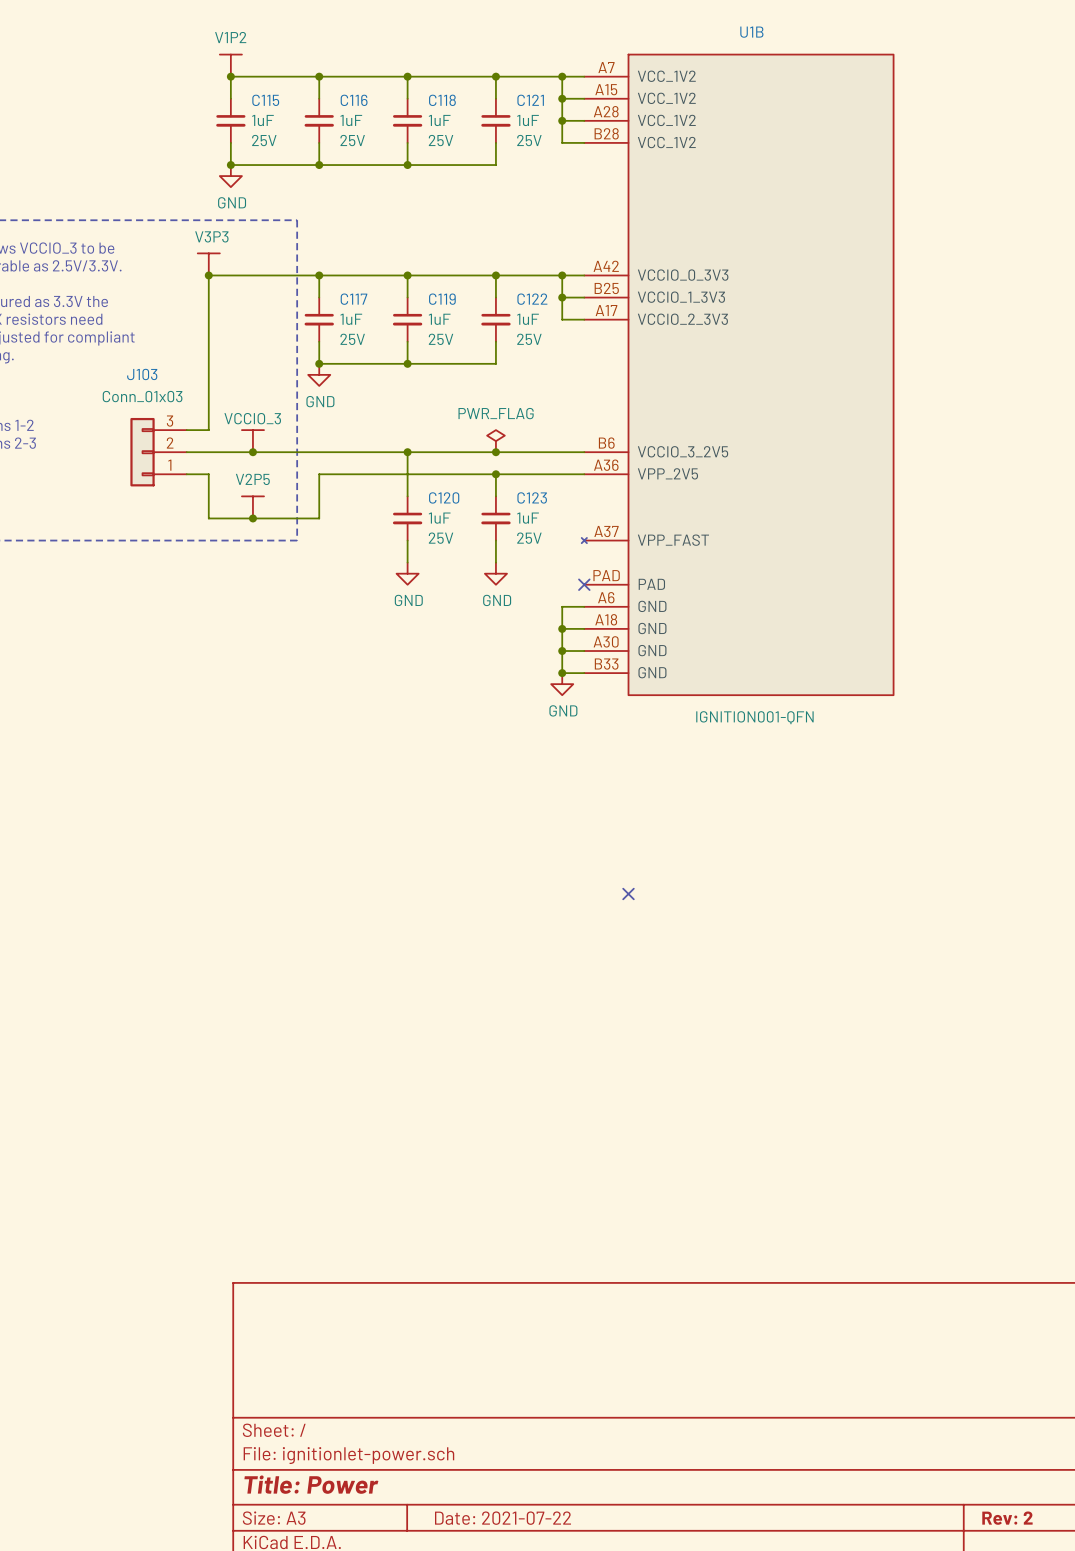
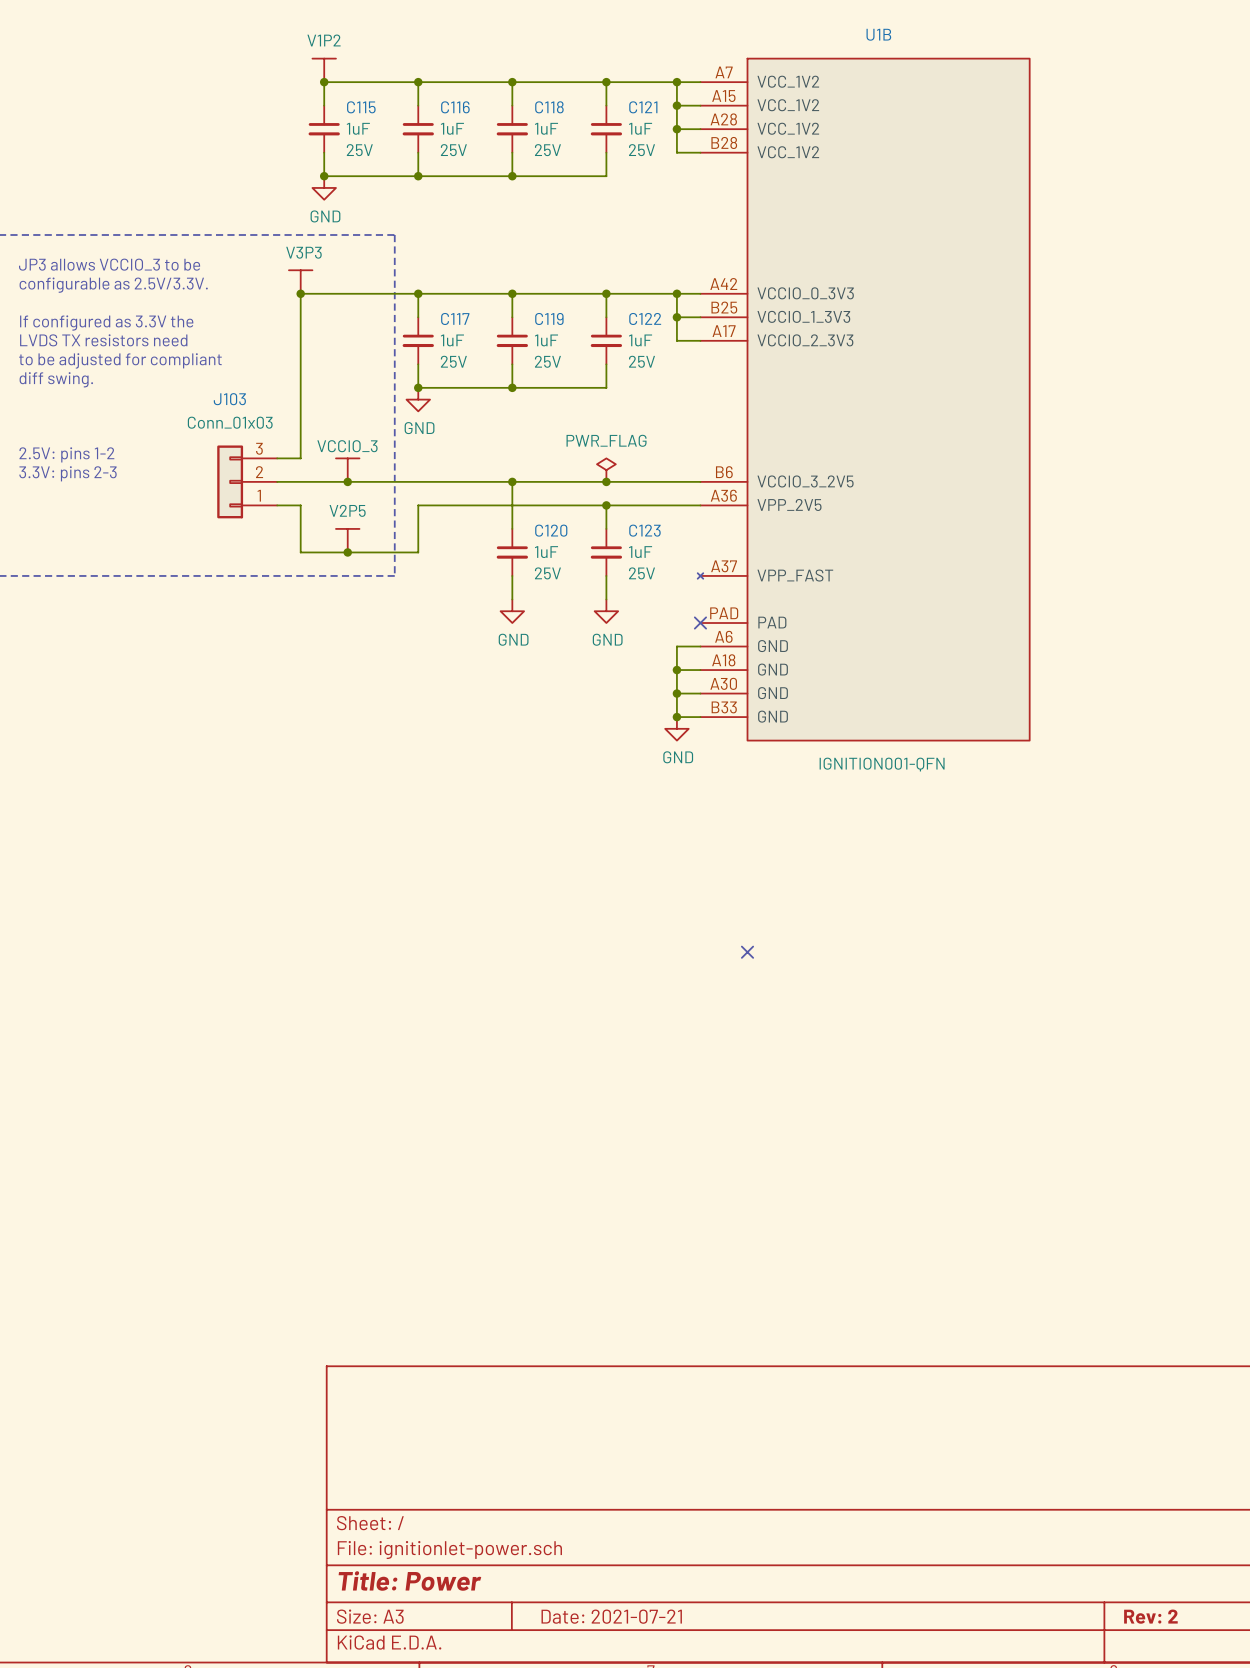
title block: Date: 2021-07-22 (503, 1518) -> Date: 2021-07-21 (611, 1616)

